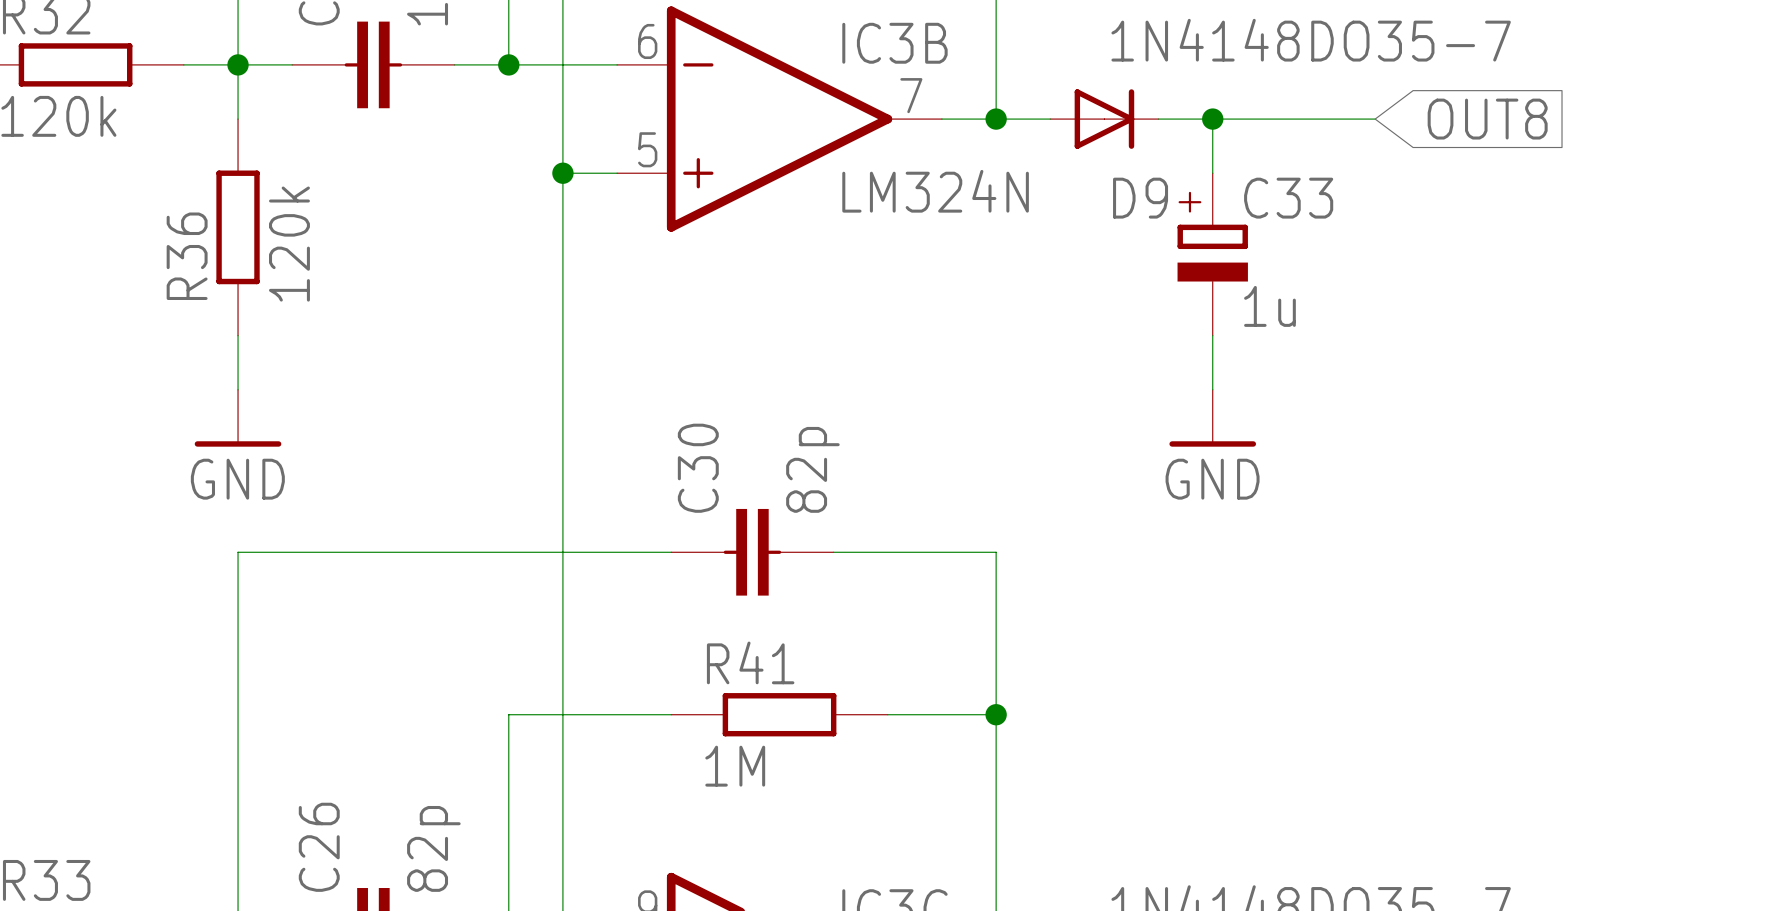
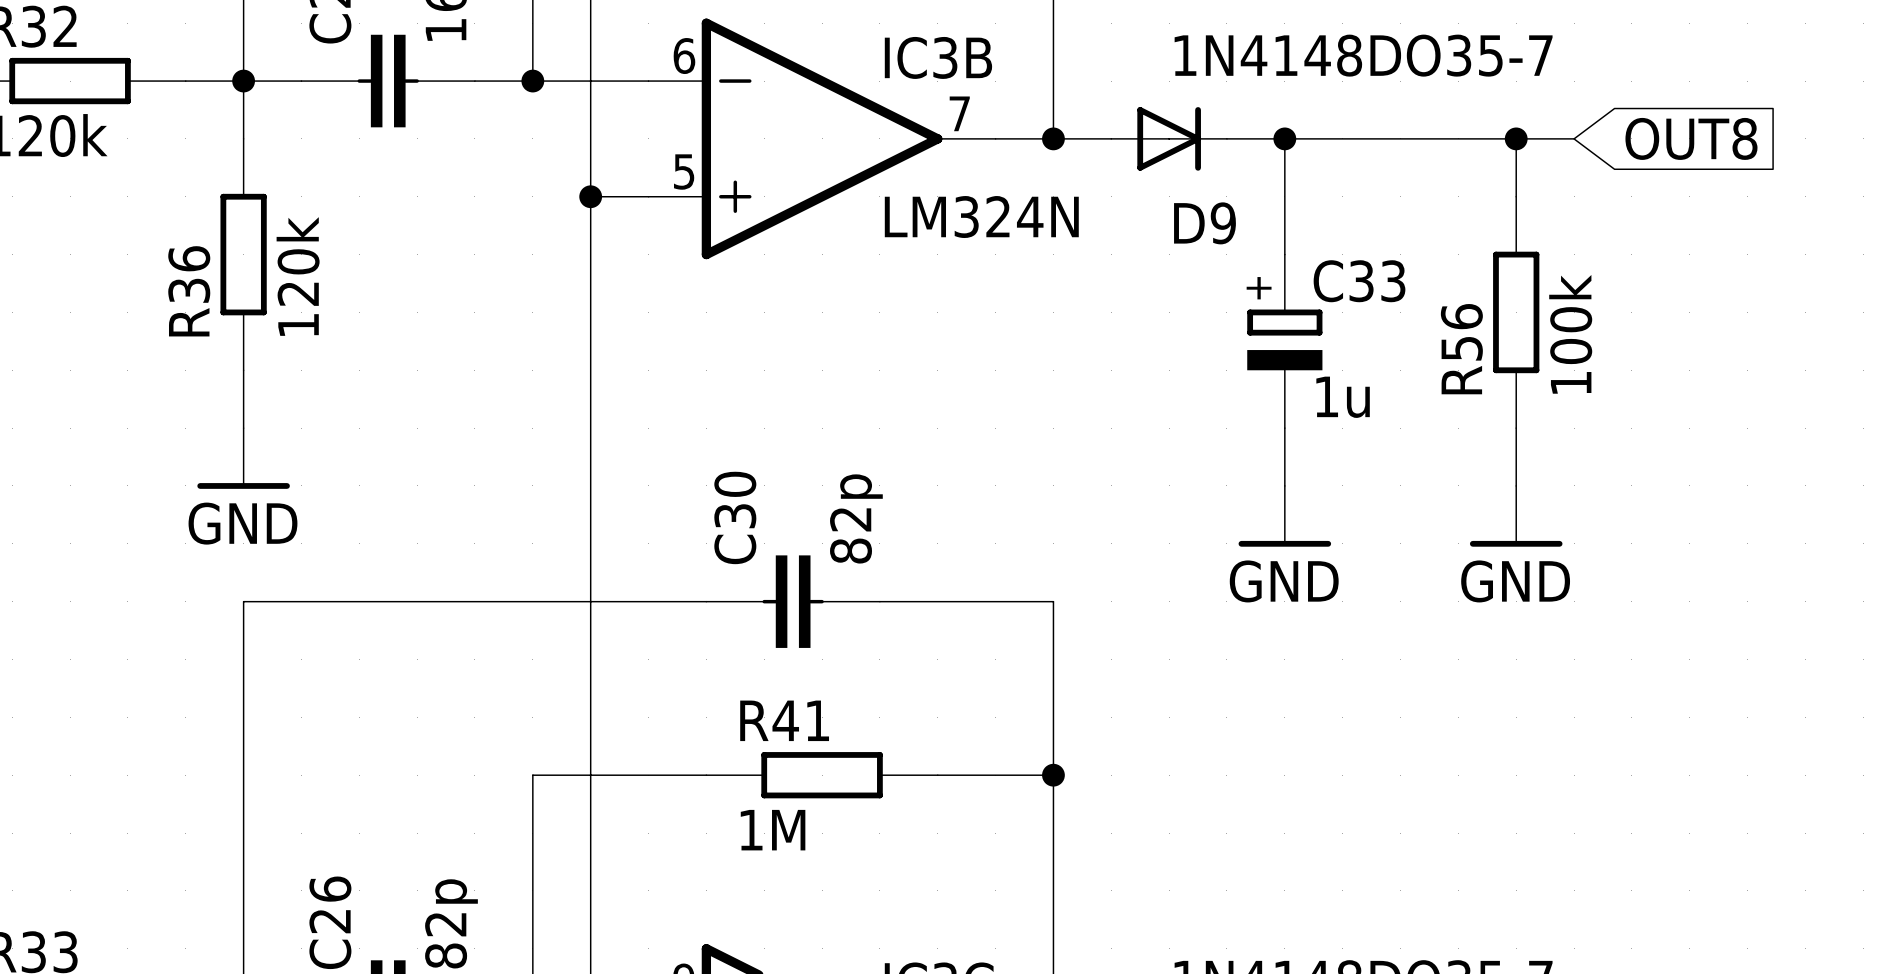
wire: none -> (1458, 138) (1574, 138)
wire: none -> (1516, 138) (1516, 196)
junction: none -> (1516, 138)
global label position: OUT8 (1487, 119) -> OUT8 (1691, 138)
C33 position: (1212, 254) -> (1284, 341)
R56: none -> 100k (1516, 312)
wire: none -> (1516, 428) (1516, 485)
power symbol position: GND (1212, 418) -> GND (1284, 516)
power symbol: none -> GND (1516, 516)

